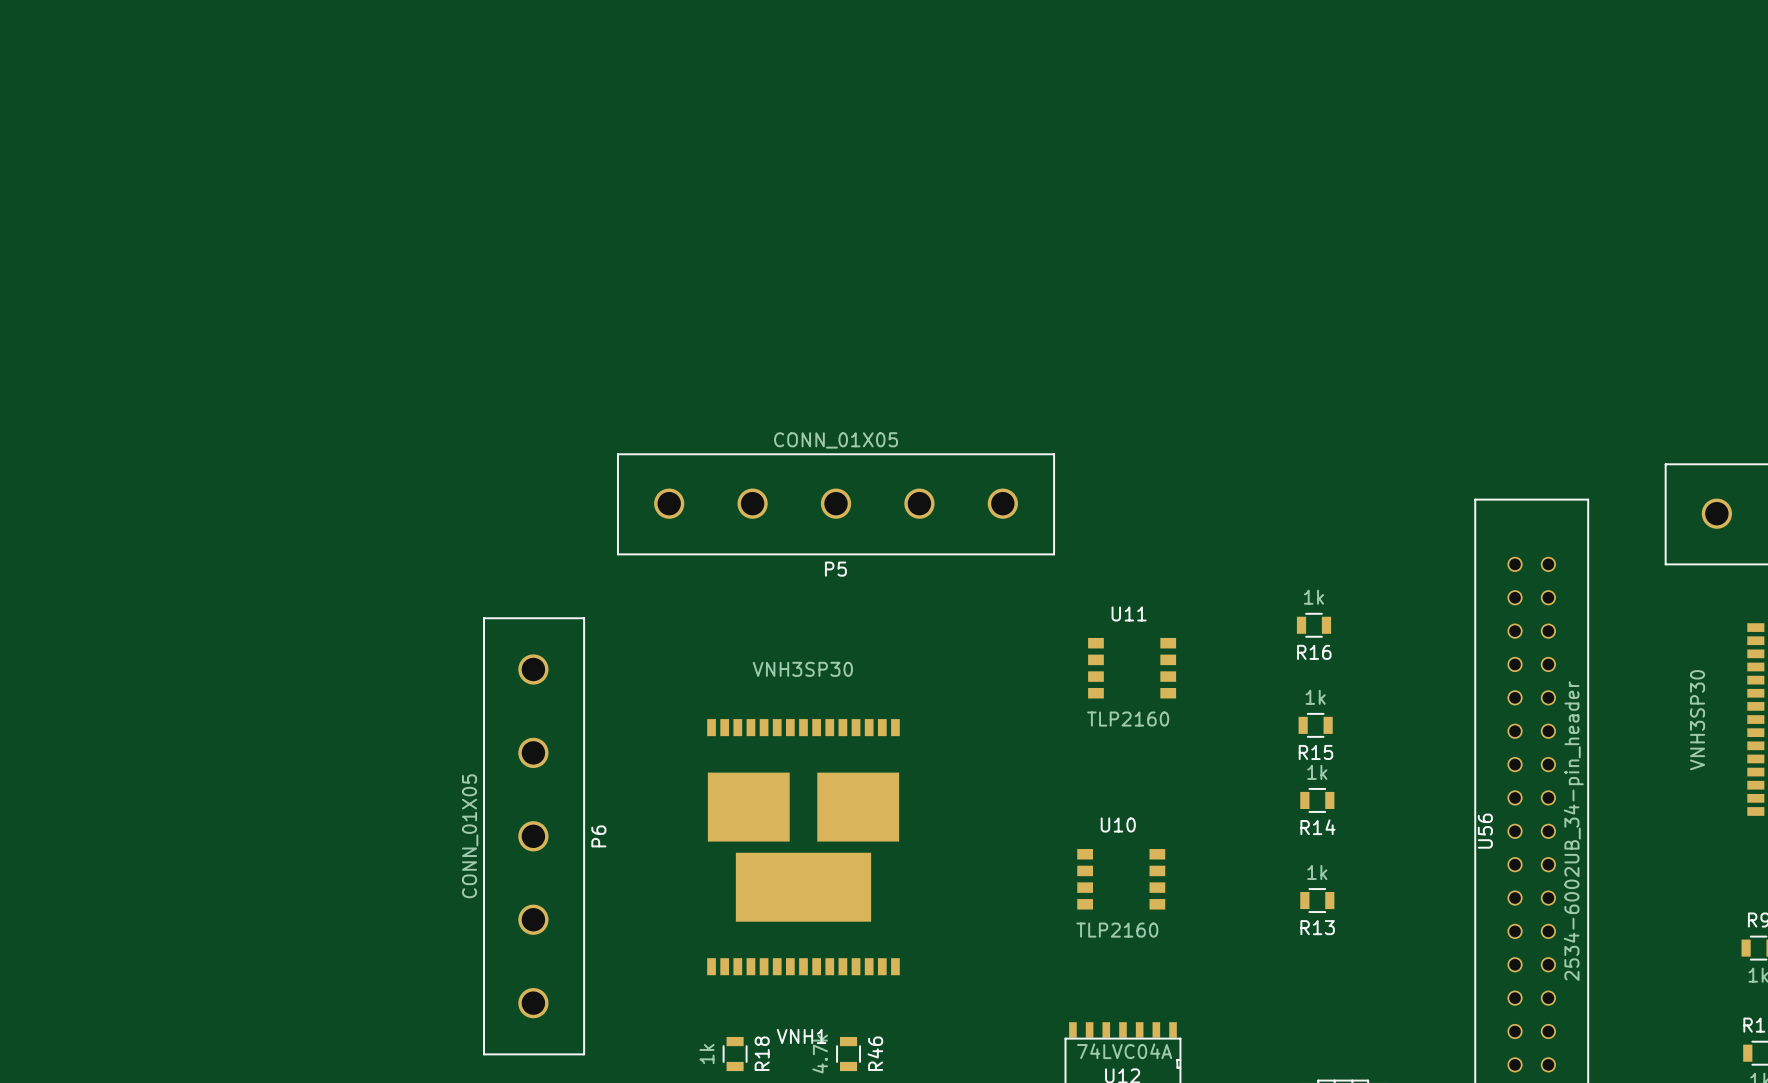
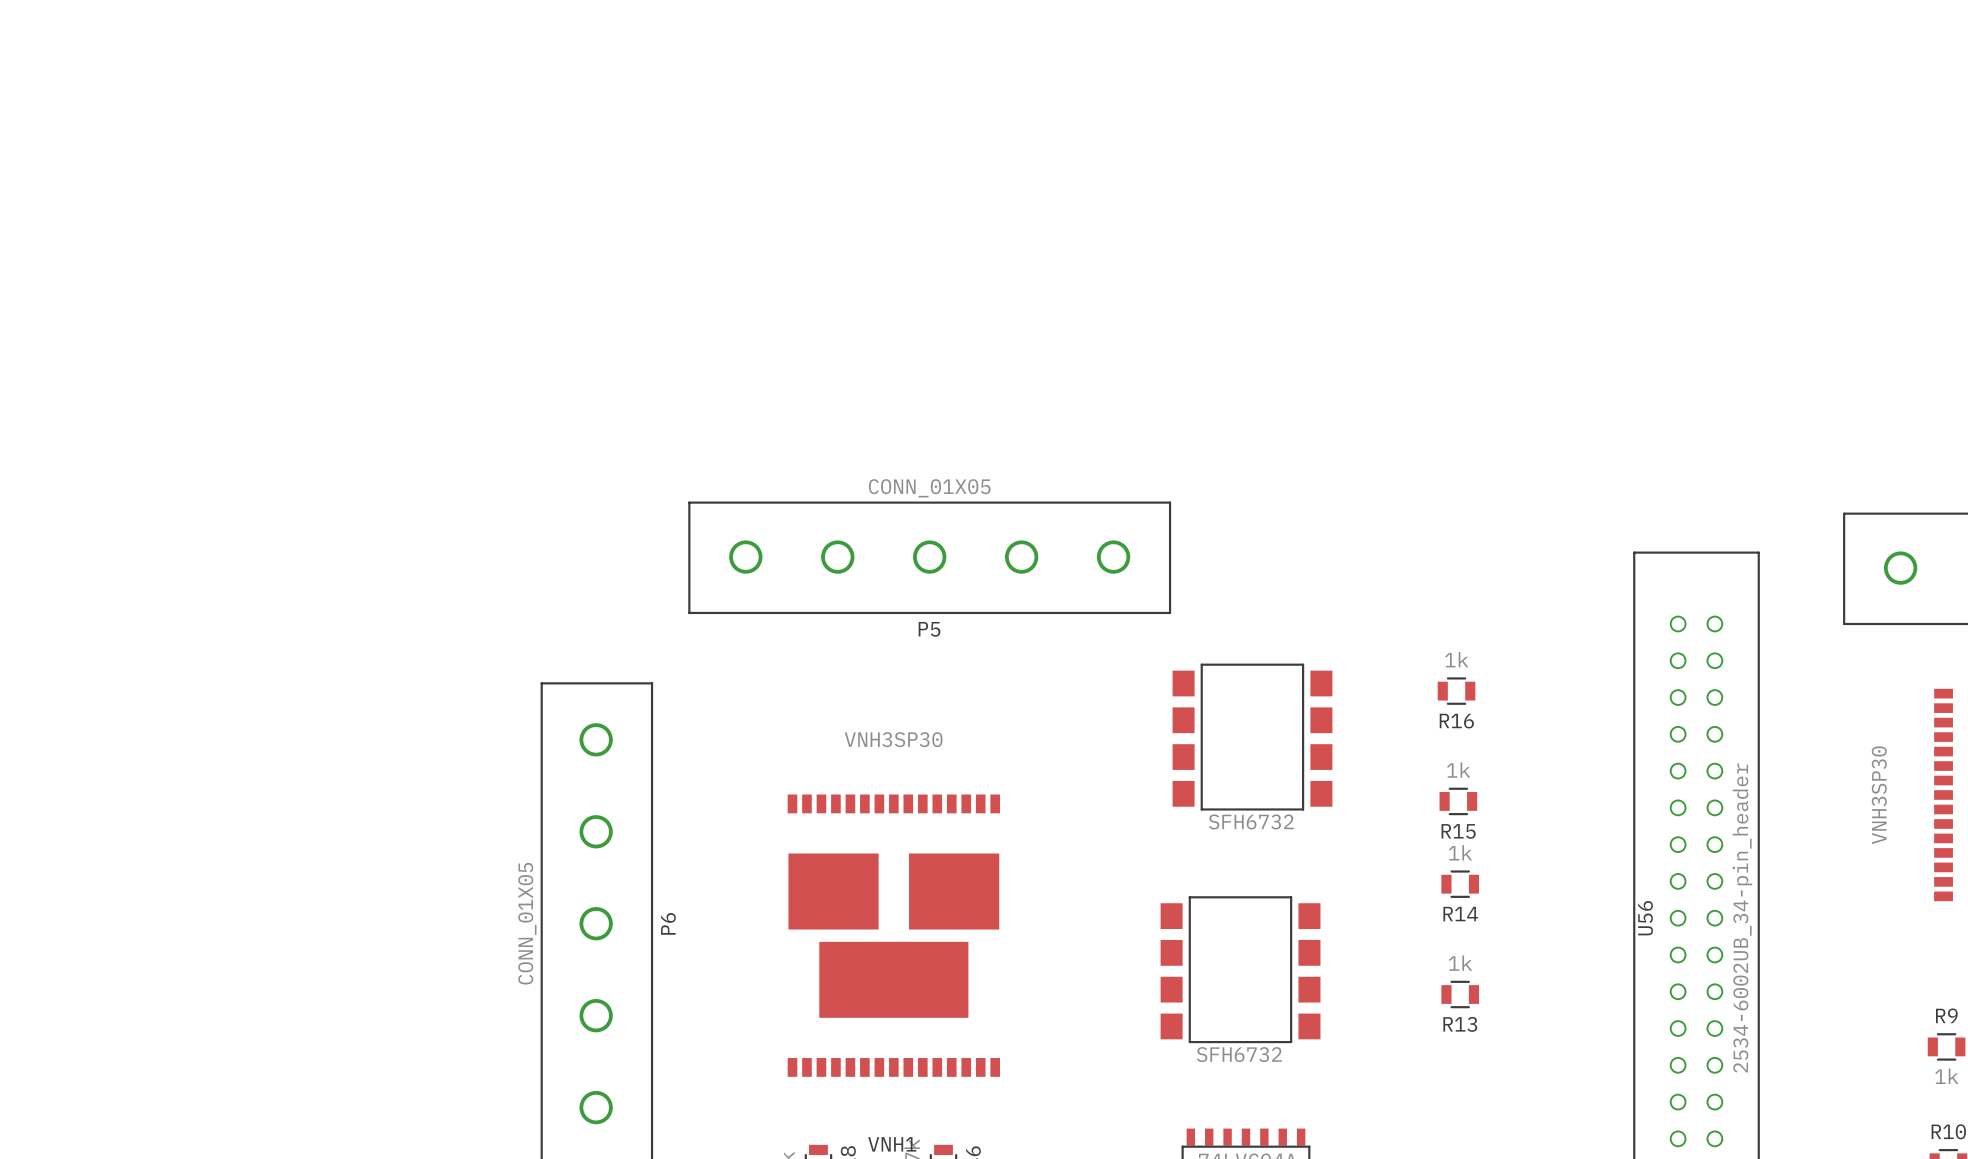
part: none -> SFH6732 (1252, 737)
U11: TLP2160 (1132, 668) -> none
part: none -> SFH6732 (1240, 969)
U10: TLP2160 (1121, 879) -> none

